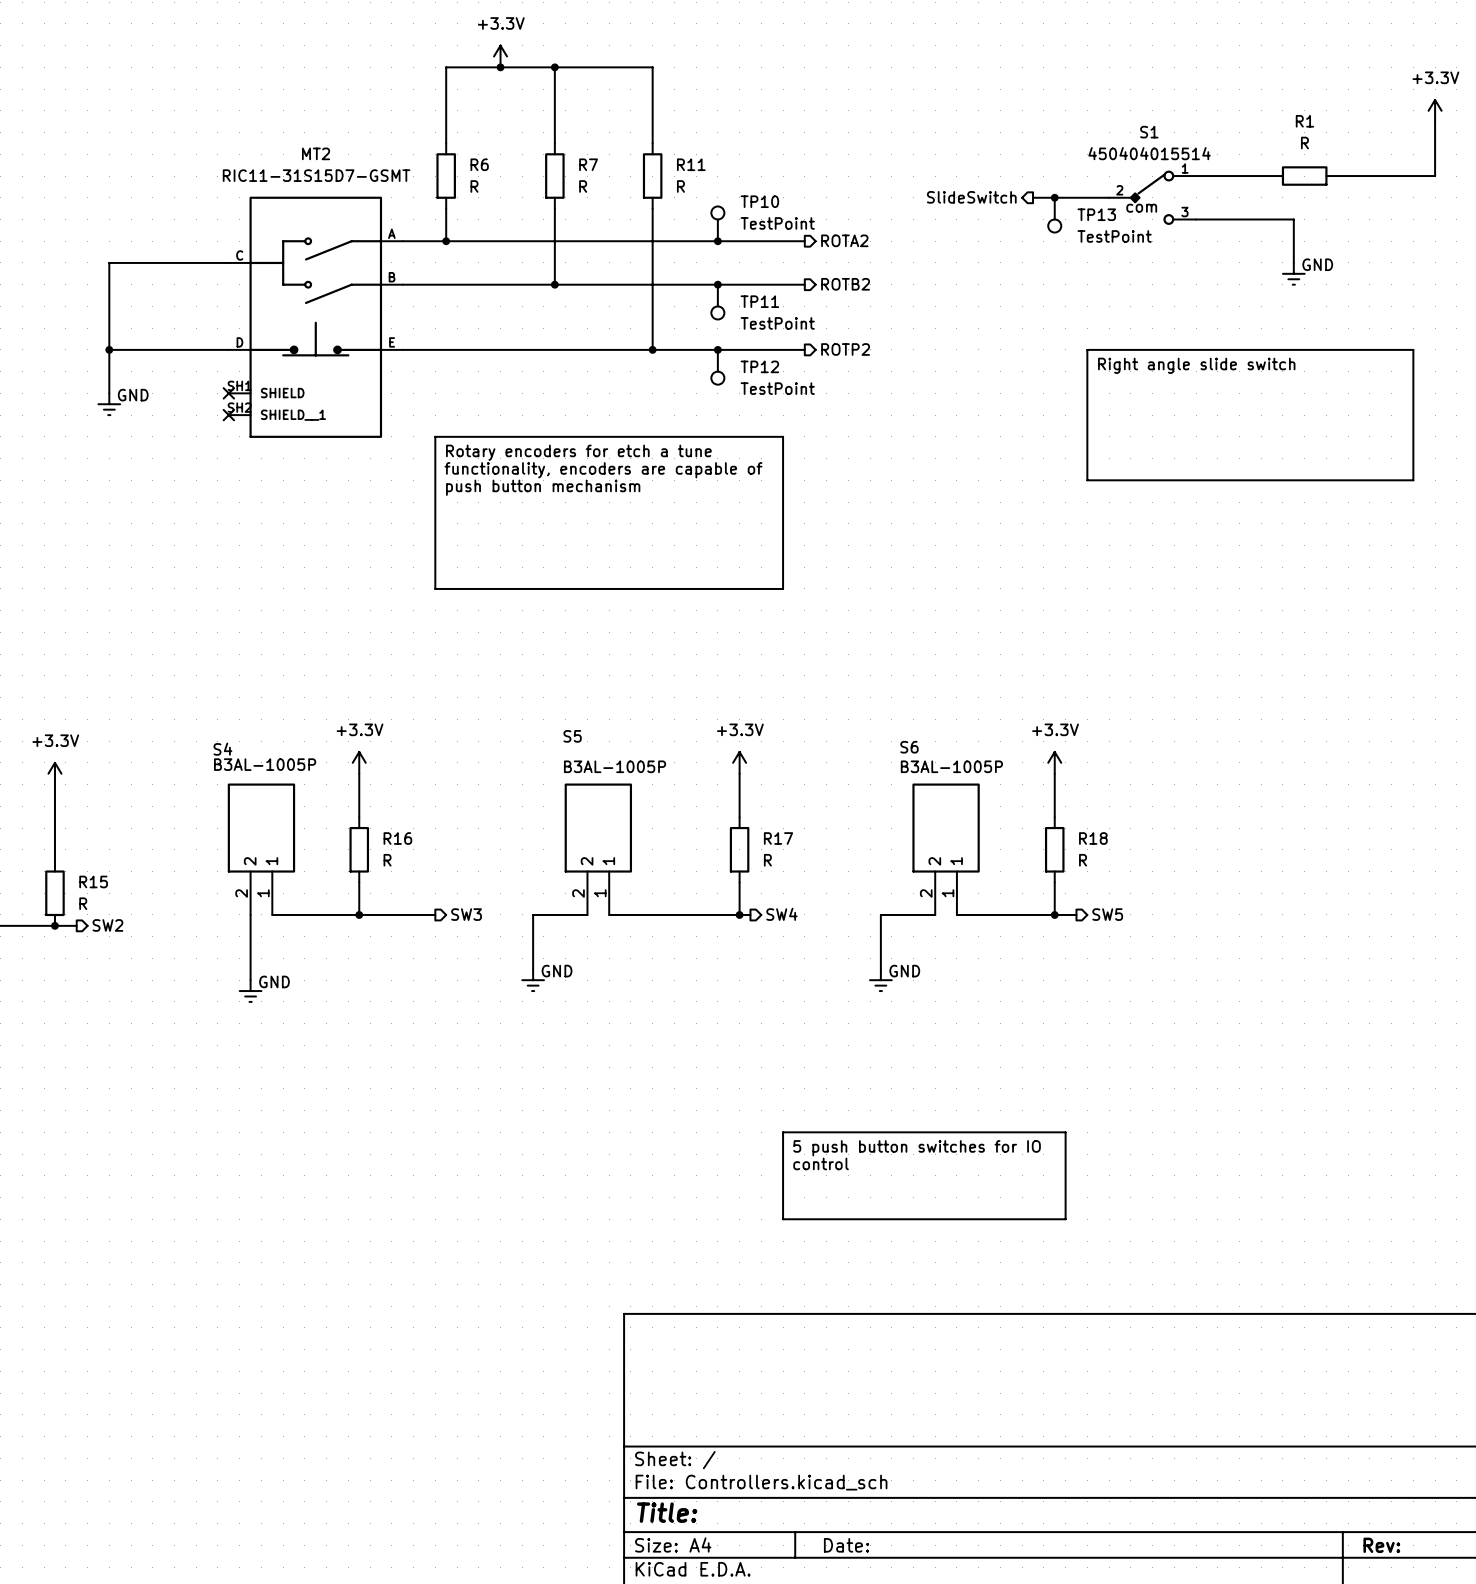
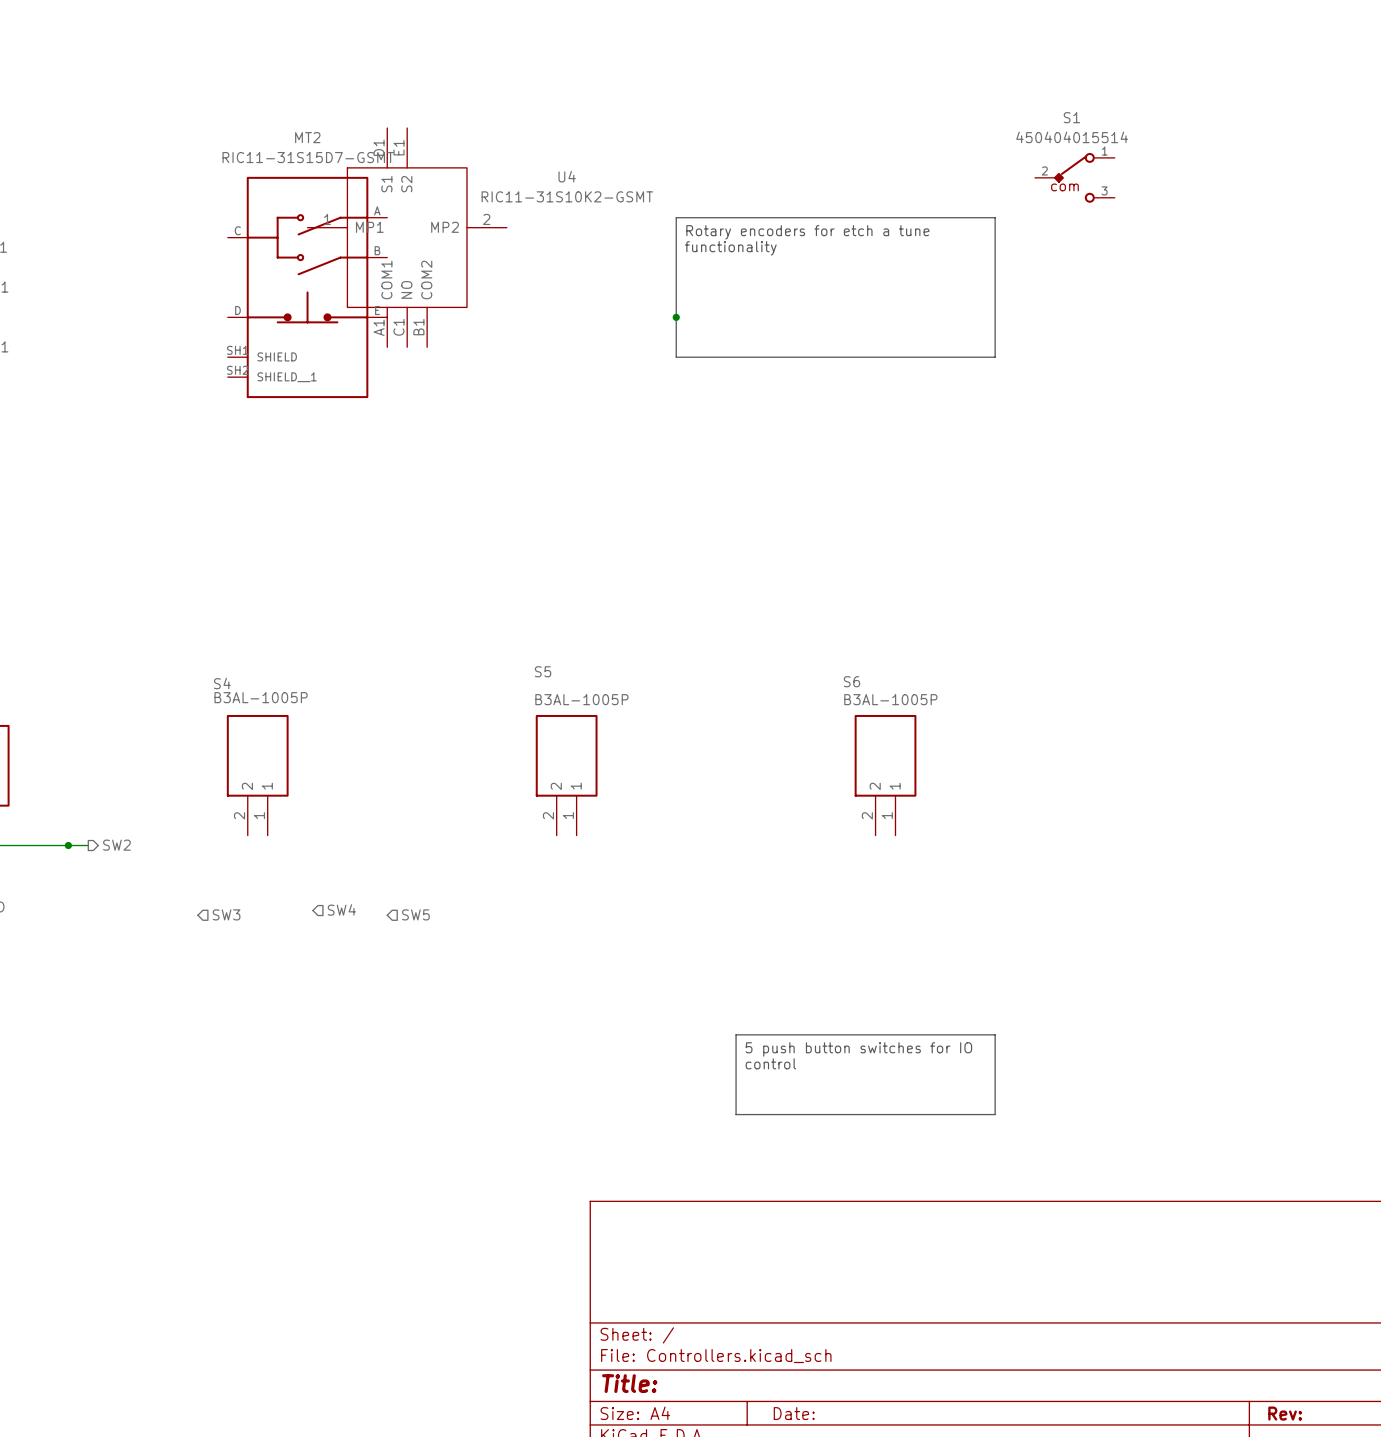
power symbol: +3.3V (500, 56) -> none
junction: (500, 67) -> none
wire: (554, 67) (554, 143) -> none
junction: (554, 67) -> none
power symbol: +3.3V (1435, 110) -> none
wire: (1435, 121) (1435, 176) (1337, 176) -> none
wire: (446, 143) (446, 67) (652, 67) (652, 143) -> none
R6: R (446, 176) -> none
R7: R (554, 176) -> none
R11: R (652, 176) -> none
wire: (1196, 176) (1272, 176) -> none
R1: R (1304, 176) -> none
hierarchical label: SlideSwitch (971, 197) -> none
wire: (1033, 197) (1109, 197) -> none
junction: (1054, 197) -> none
wire: (446, 208) (446, 241) -> none
wire: (554, 208) (554, 284) -> none
wire: (652, 208) (652, 349) -> none
TP13: TestPoint (1054, 215) -> none
wire: (1196, 219) (1293, 219) (1293, 262) -> none
TP10: TestPoint (717, 223) -> none
hierarchical label: ROTA2 (844, 240) -> none
wire: (402, 241) (804, 241) -> none
junction: (446, 241) -> none
line: none -> (676, 217) (995, 217) (995, 357) (676, 357) (676, 217)
junction: (717, 241) -> none
text: none -> Rotary encoders for etch a tune (807, 232)
wire: (228, 262) (109, 262) (109, 393) -> none
U4: none -> RIC11-31S10K2-GSMT (407, 237)
power symbol: GND (1293, 273) -> none
text: none -> functionality (730, 248)
wire: (402, 284) (804, 284) -> none
junction: (554, 284) -> none
junction: (717, 284) -> none
hierarchical label: ROTB2 (845, 284) -> none
TP11: TestPoint (717, 302) -> none
wire: (109, 349) (228, 349) -> none
junction: (109, 349) -> none
wire: (402, 349) (804, 349) -> none
junction: (652, 349) -> none
hierarchical label: ROTP2 (845, 349) -> none
line: (1087, 349) (1413, 349) (1413, 480) (1087, 480) (1087, 349) -> none
text: Right angle slide switch (1196, 365) -> none
TP12: TestPoint (717, 367) -> none
no-connect mark: (228, 393) -> none
power symbol: GND (109, 404) -> none
no-connect mark: (228, 415) -> none
line: (435, 436) (783, 436) (783, 588) (435, 588) (435, 436) -> none
text: Rotary encoders for etch a tune (578, 452) -> none
text: functionality, encoders are capable of (603, 470) -> none
text: push button mechanism (543, 487) -> none
power symbol: +3.3V (359, 762) -> none
power symbol: +3.3V (739, 762) -> none
power symbol: +3.3V (1054, 762) -> none
power symbol: +3.3V (54, 773) -> none
wire: (359, 773) (359, 817) -> none
wire: (739, 773) (739, 817) -> none
wire: (1054, 773) (1054, 817) -> none
wire: (54, 784) (54, 860) -> none
R16: R (359, 849) -> none
R17: R (739, 849) -> none
R18: R (1054, 849) -> none
wire: (359, 882) (359, 914) -> none
wire: (739, 882) (739, 914) -> none
wire: (1054, 882) (1054, 914) -> none
R15: R (54, 893) -> none
wire: (250, 914) (250, 980) -> none
wire: (272, 914) (435, 914) -> none
junction: (359, 914) -> none
hierarchical label: SW3 (466, 914) -> none
wire: (587, 914) (533, 914) (533, 969) -> none
wire: (609, 914) (750, 914) -> none
junction: (739, 914) -> none
hierarchical label: SW4 (781, 914) -> none
wire: (935, 914) (880, 914) (880, 969) -> none
wire: (956, 914) (1076, 914) -> none
junction: (1054, 914) -> none
hierarchical label: SW5 (1107, 914) -> none
power symbol: GND (533, 980) -> none
power symbol: GND (880, 980) -> none
power symbol: GND (250, 991) -> none
hierarchical label: none -> SW4 (341, 909)
hierarchical label: none -> SW3 (226, 914)
hierarchical label: none -> SW5 (415, 914)

